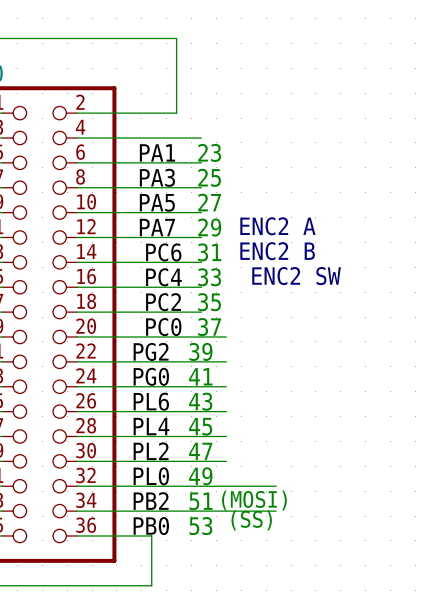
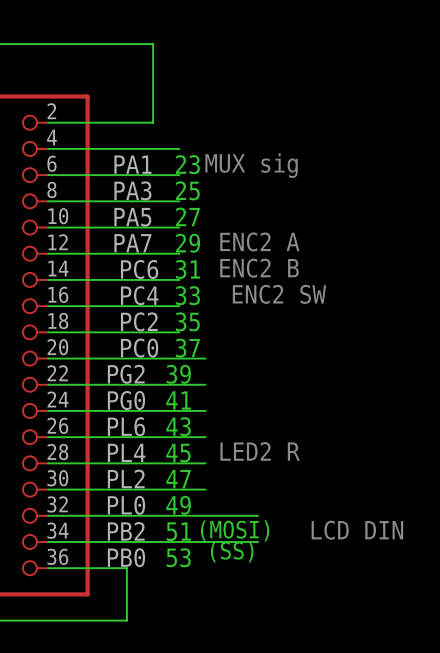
text: none -> MUX sig (251, 165)
text: none -> LED2 R (260, 451)
text: none -> LCD DIN (357, 530)

